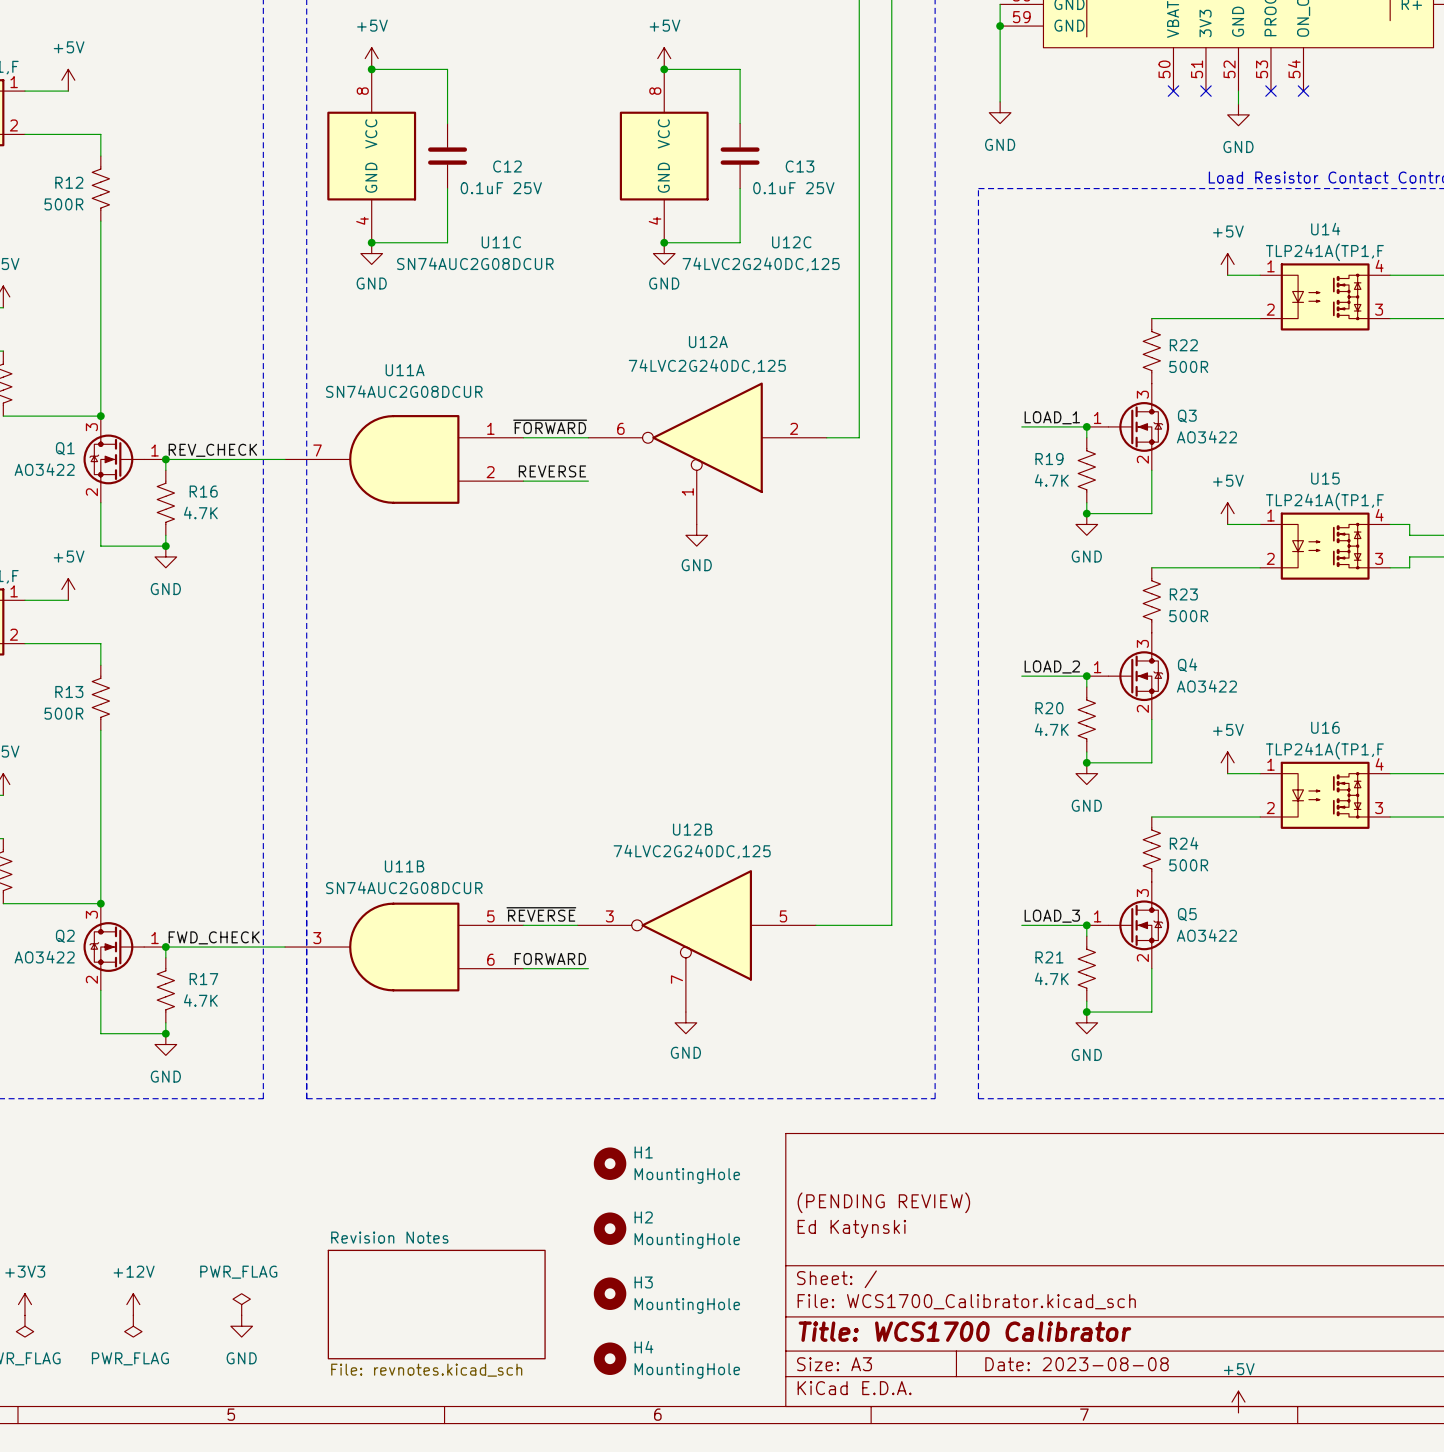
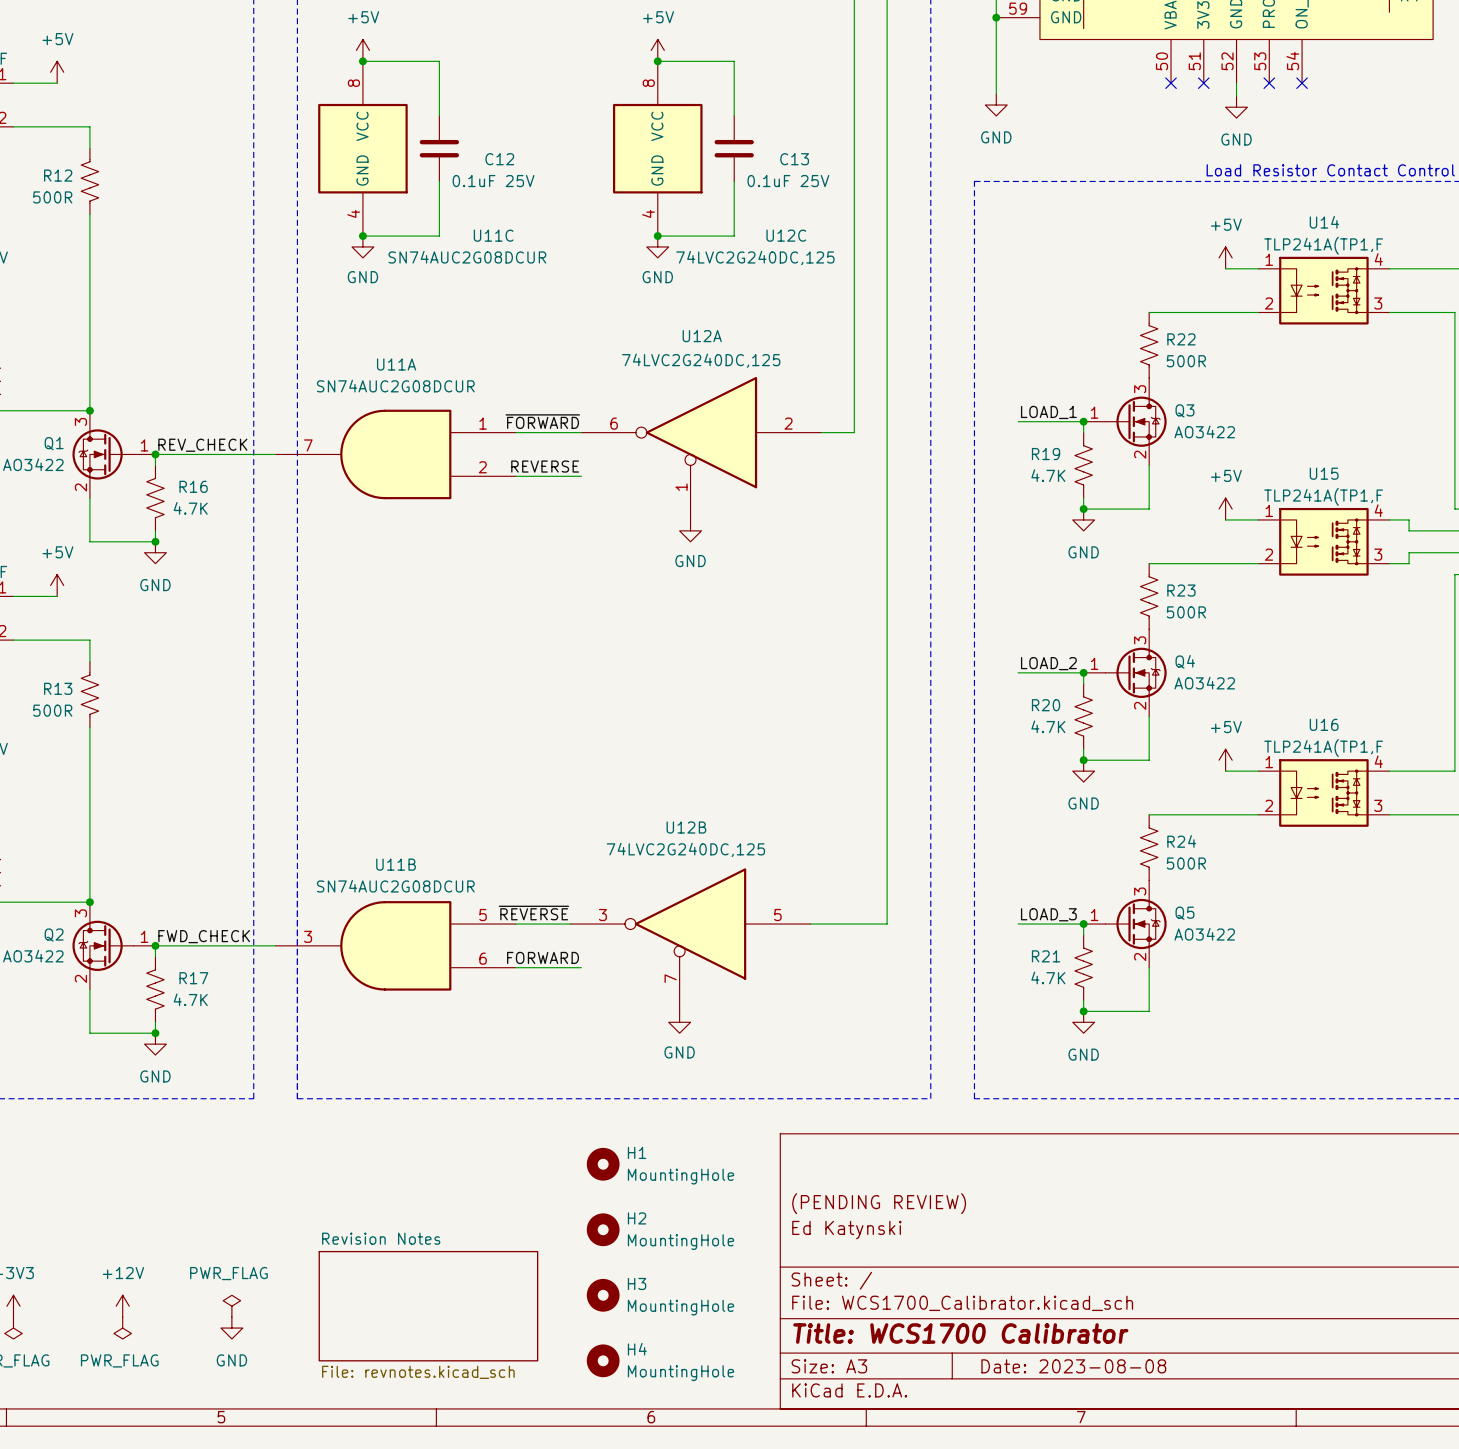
power symbol: +5V (1238, 1402) -> none

